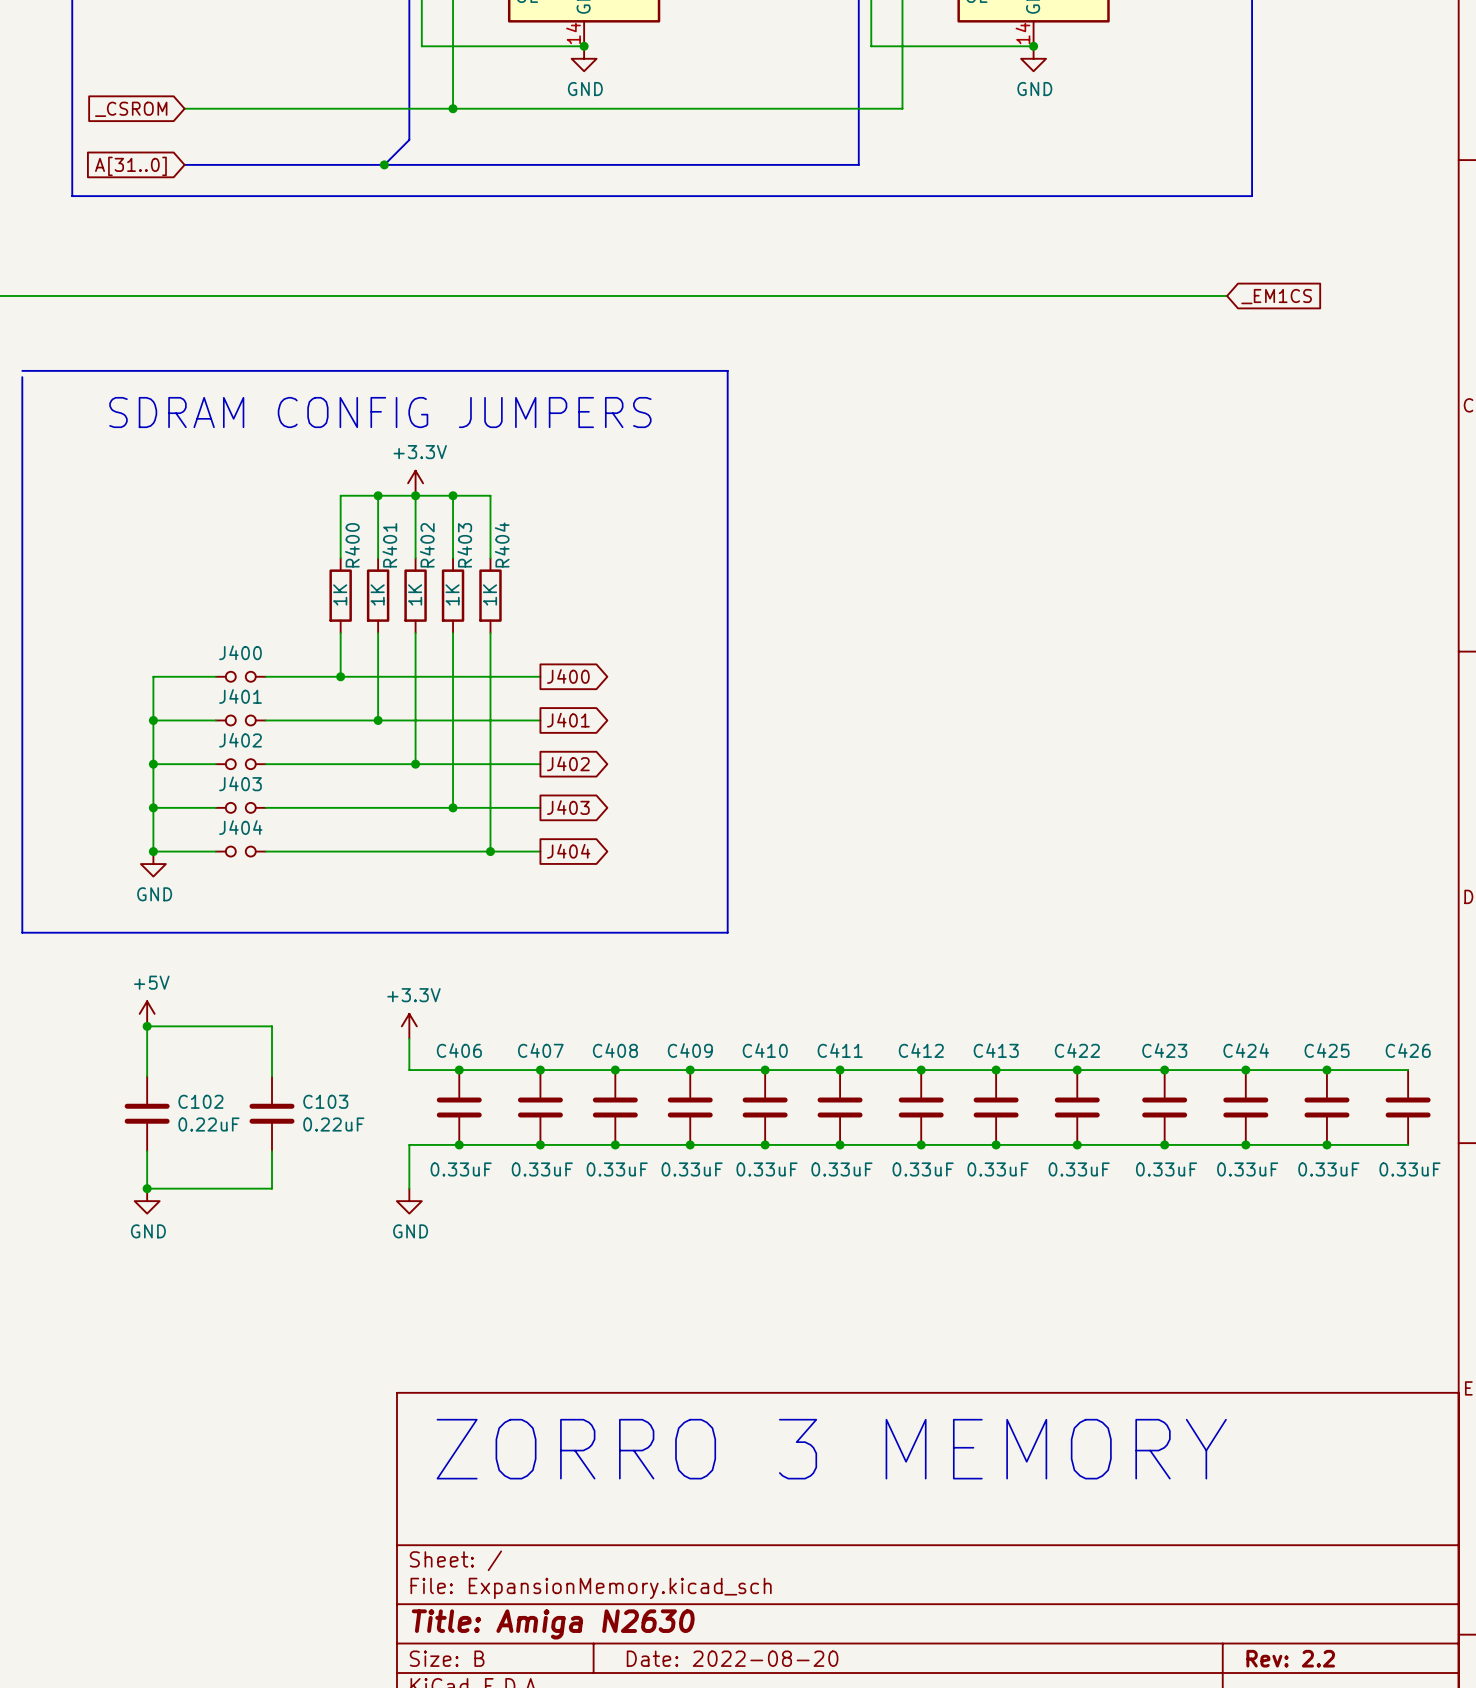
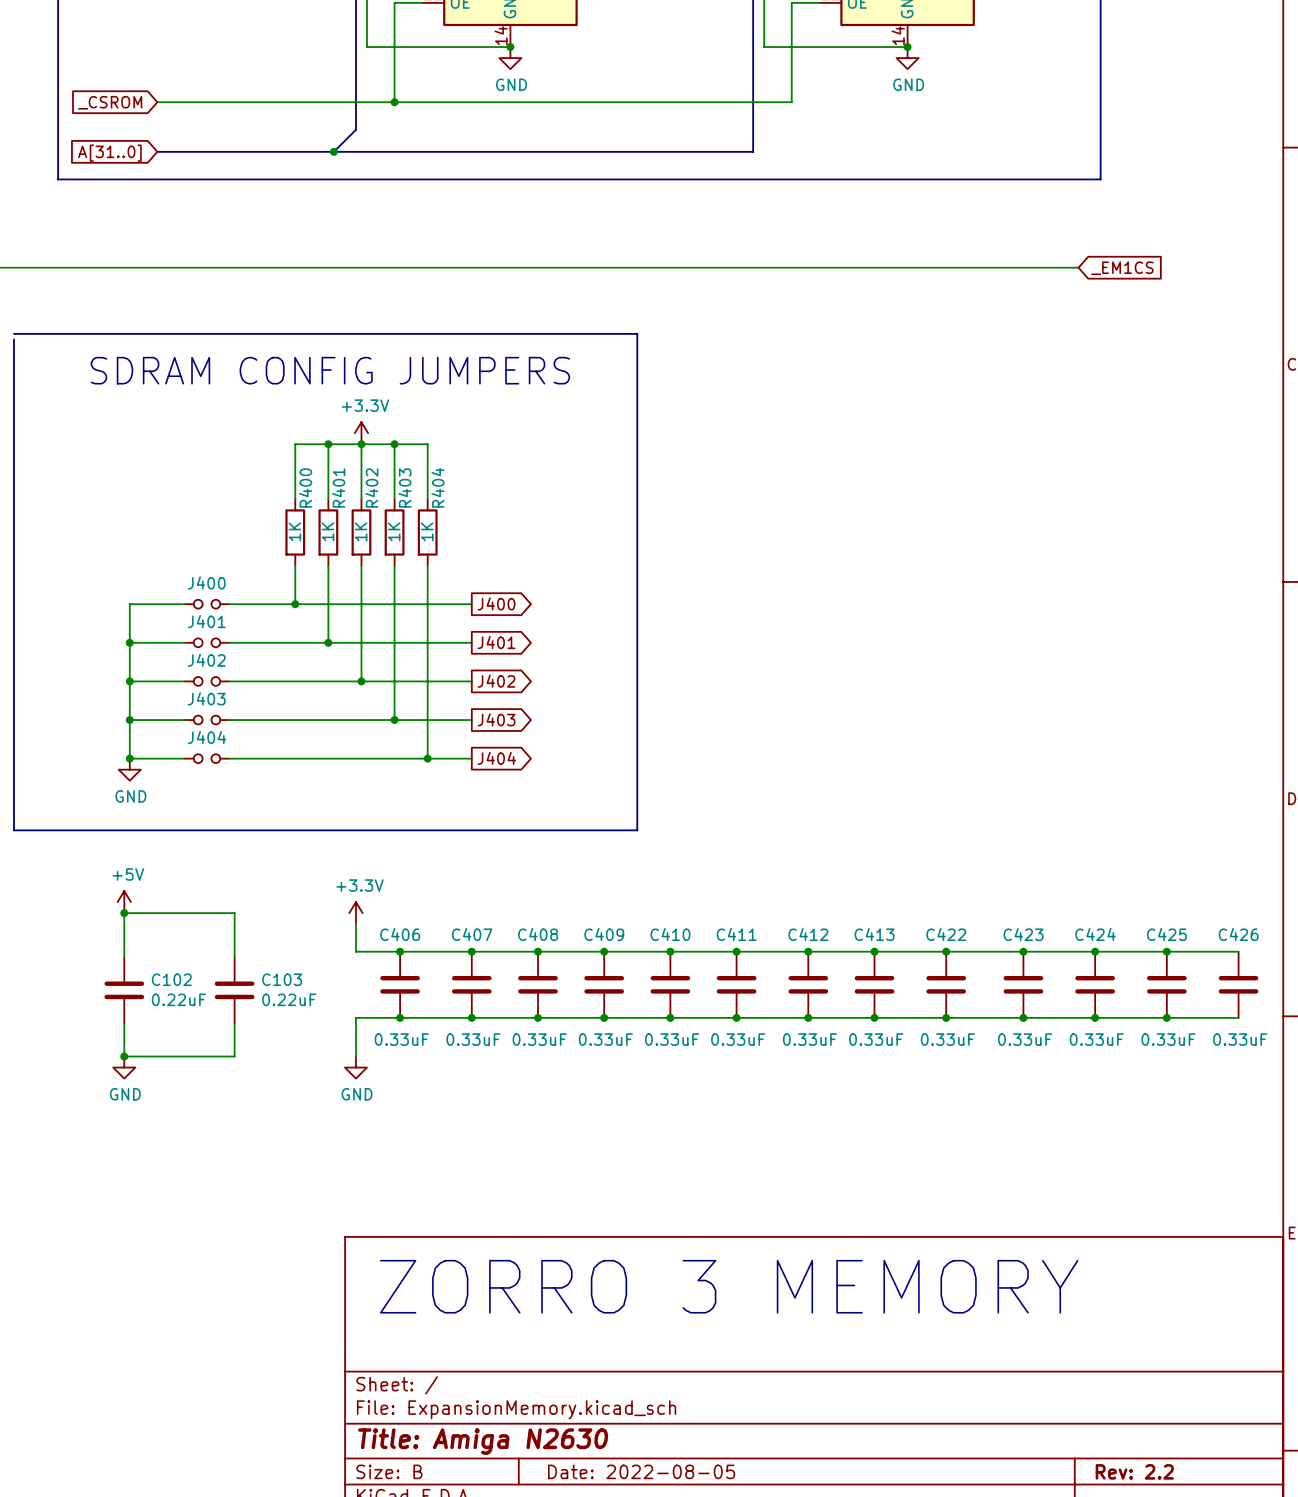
title block: Date: 2022-08-20 (732, 1658) -> Date: 2022-08-05 (641, 1471)

